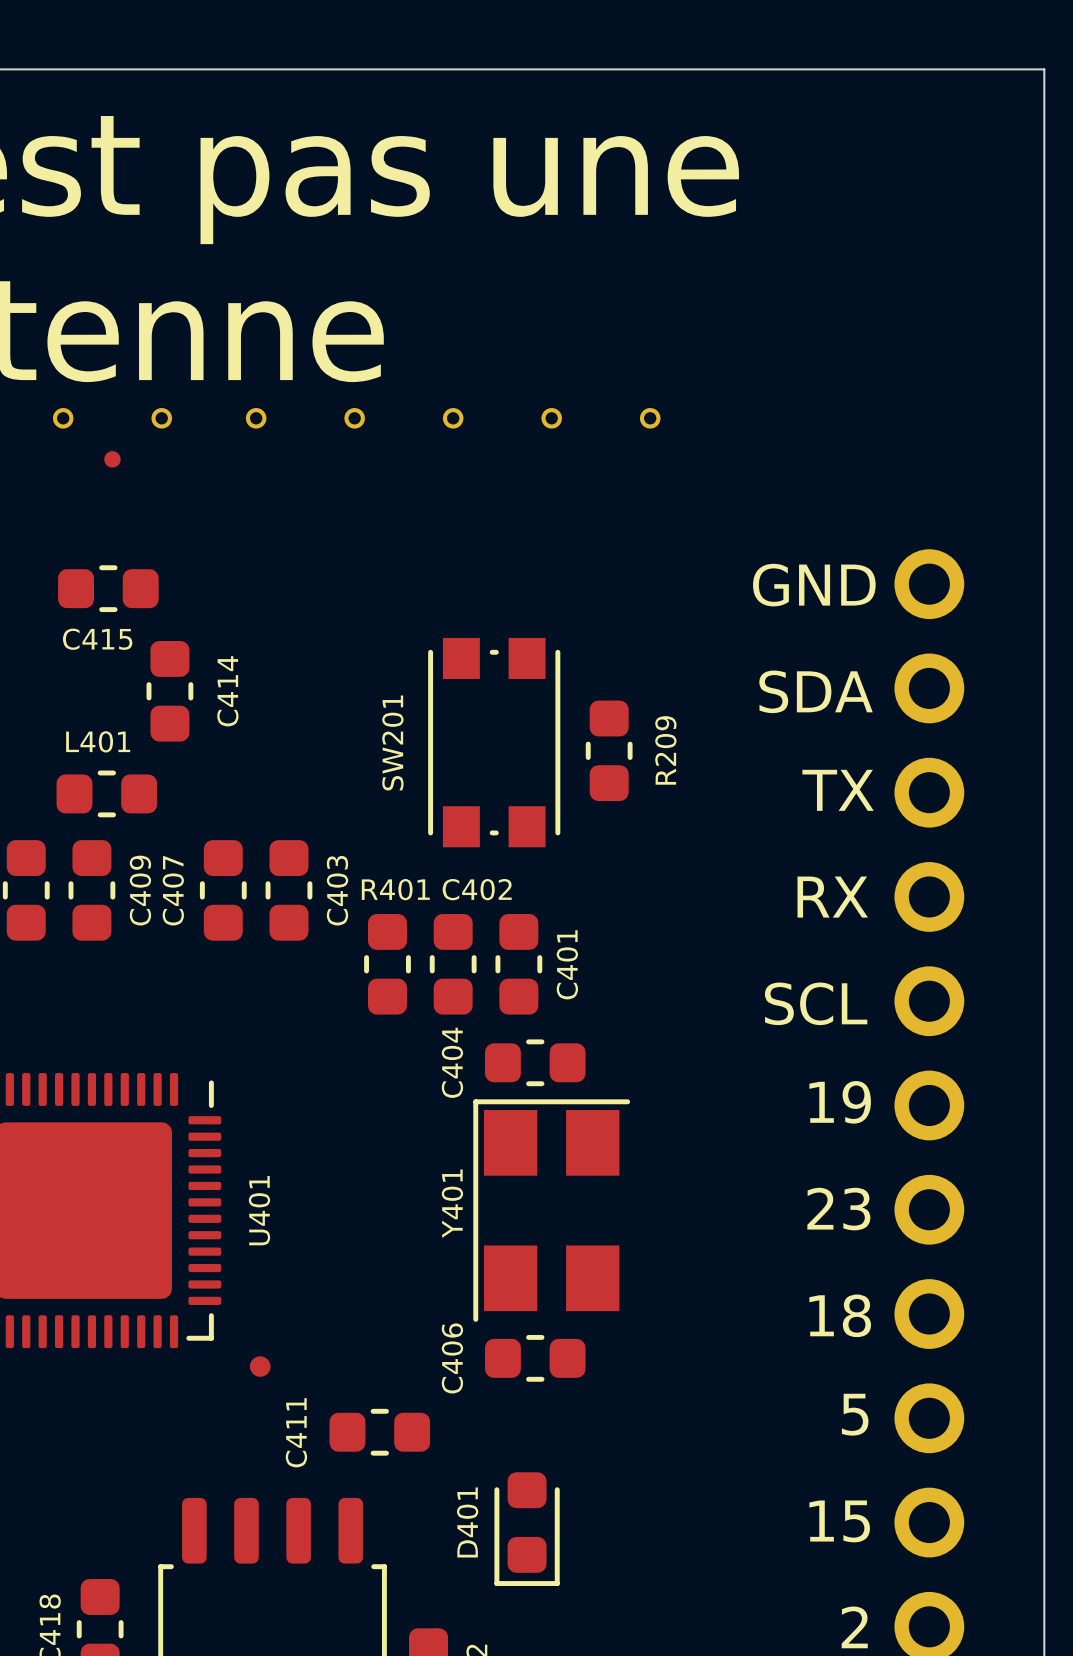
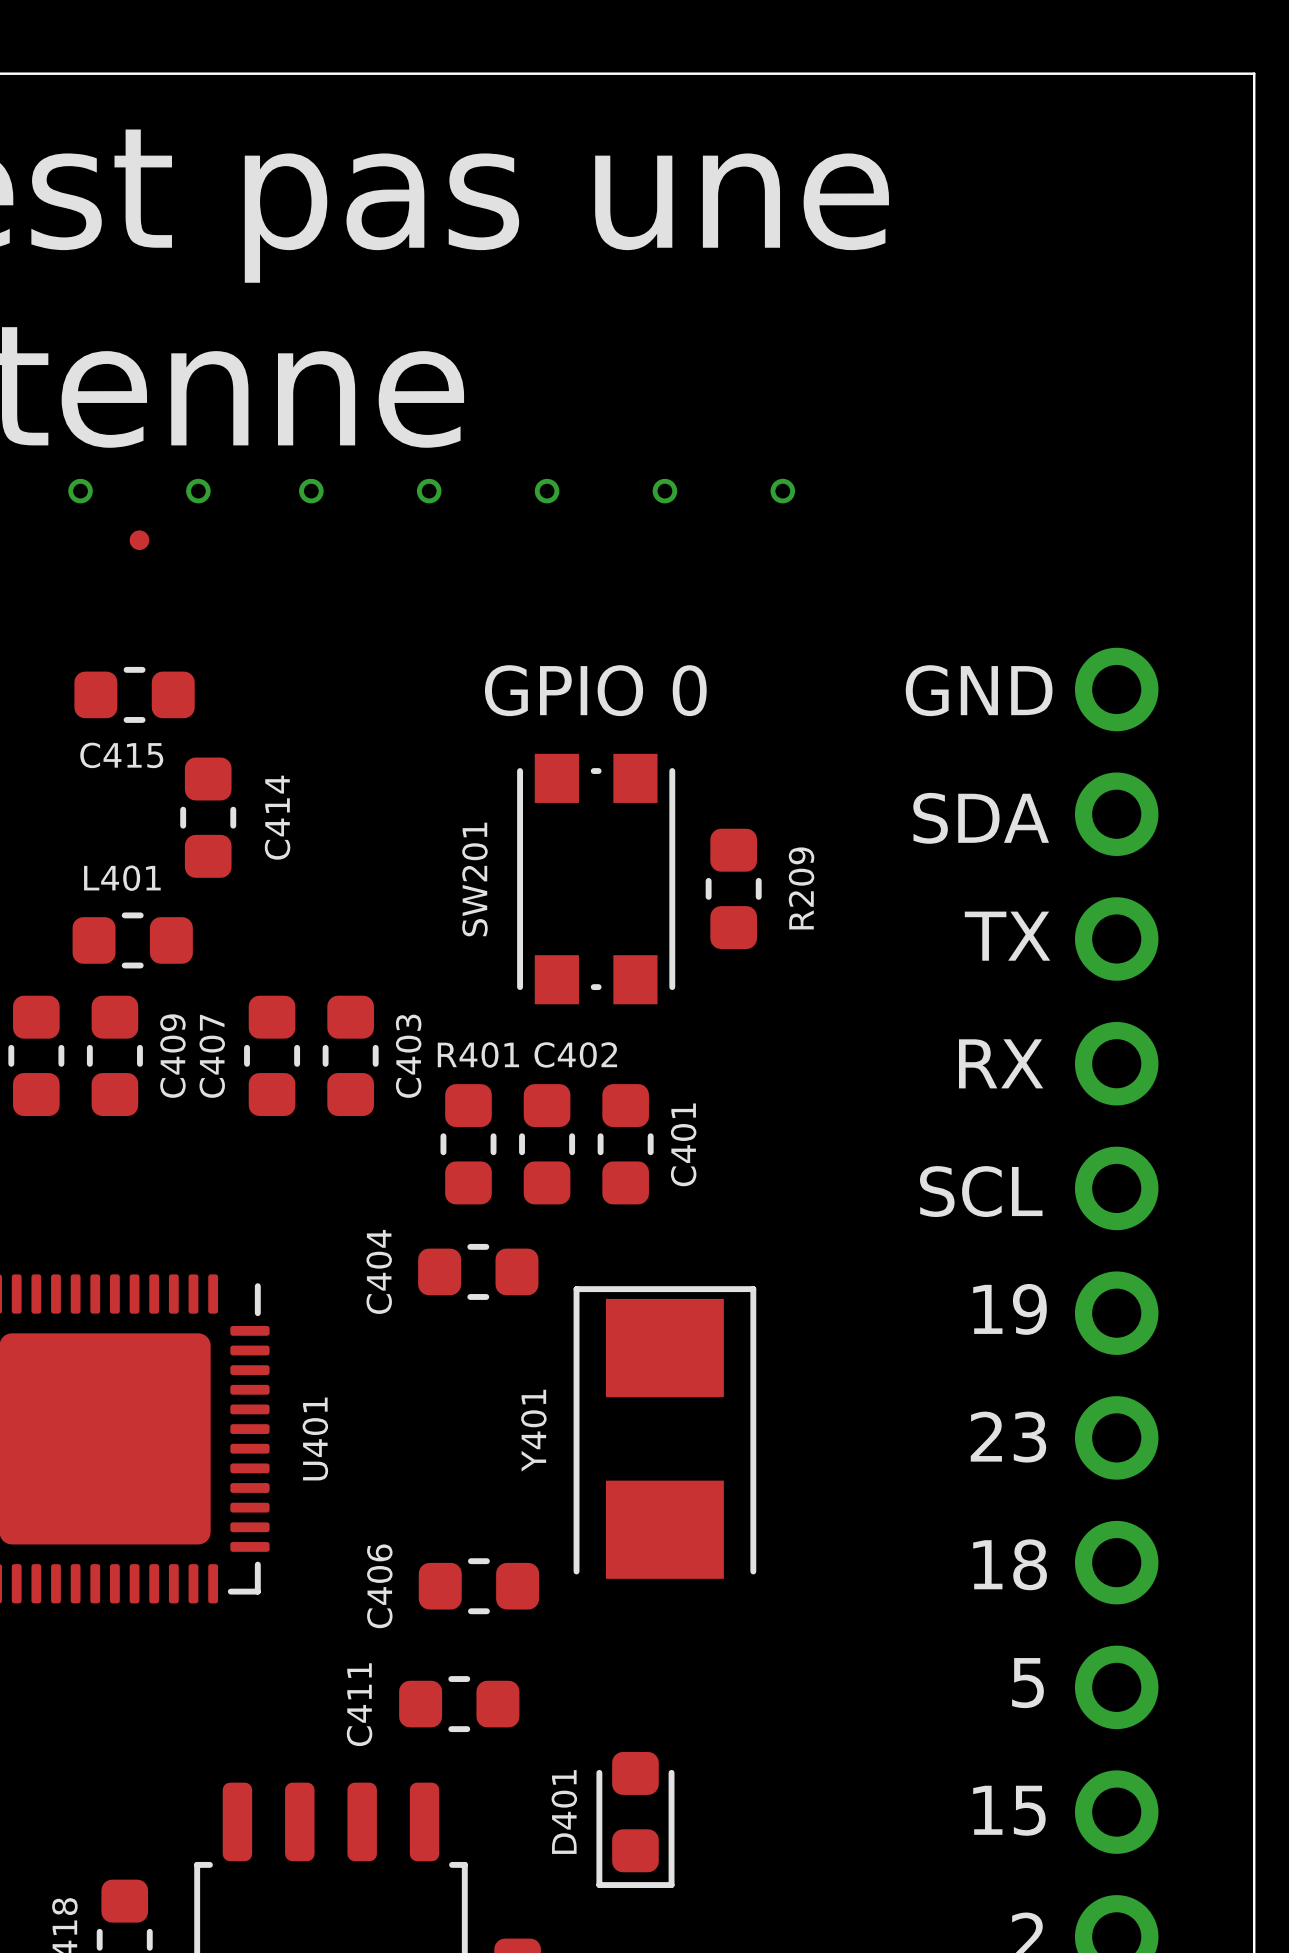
text: none -> GPIO 0 (595, 690)
C404 position: (535, 1062) -> (478, 1271)
Y401 footprint: [473, 1099, 631, 1322] -> [573, 1286, 757, 1579]
C406 position: (535, 1358) -> (478, 1586)
part: (260, 1366) -> none

